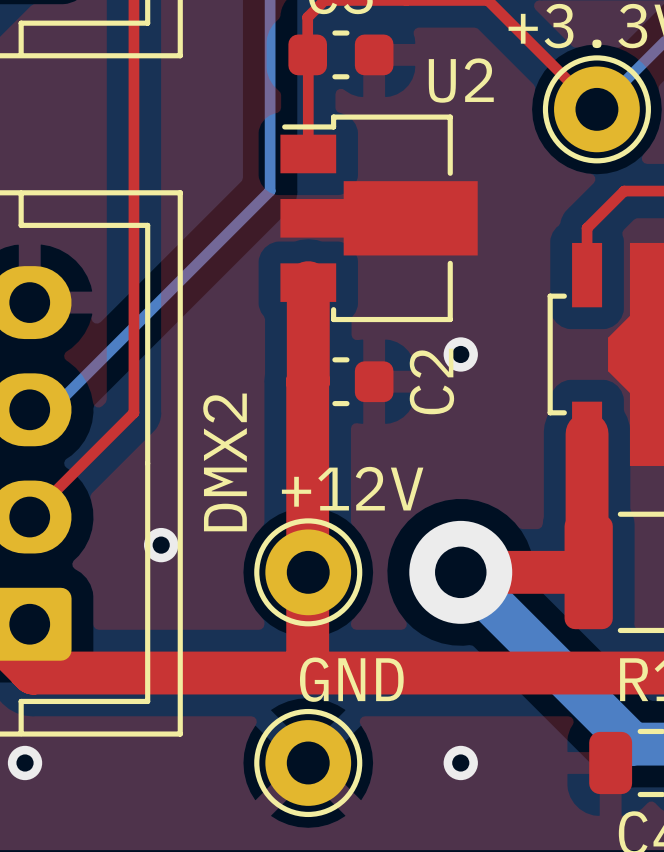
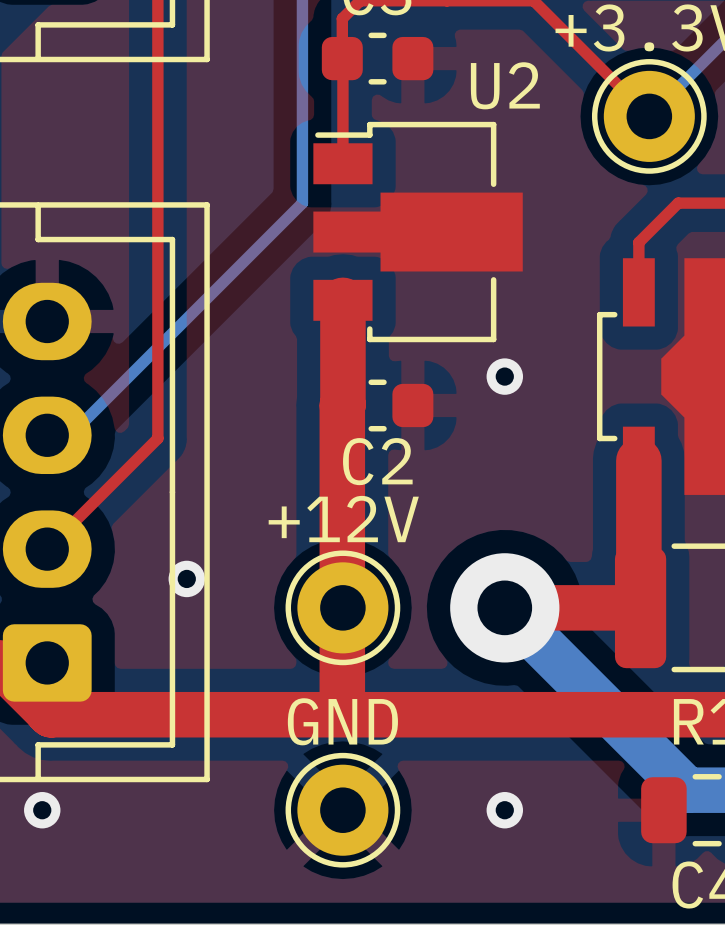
C2 name rotation: 0° (431, 381) -> 90° clockwise (377, 461)
C2 name position: C2 (431, 381) -> C2 (377, 461)
part value: DMX2 (225, 462) -> none
part value position: +12V (352, 488) -> +12V (343, 519)
part value position: GND (351, 679) -> GND (342, 721)

